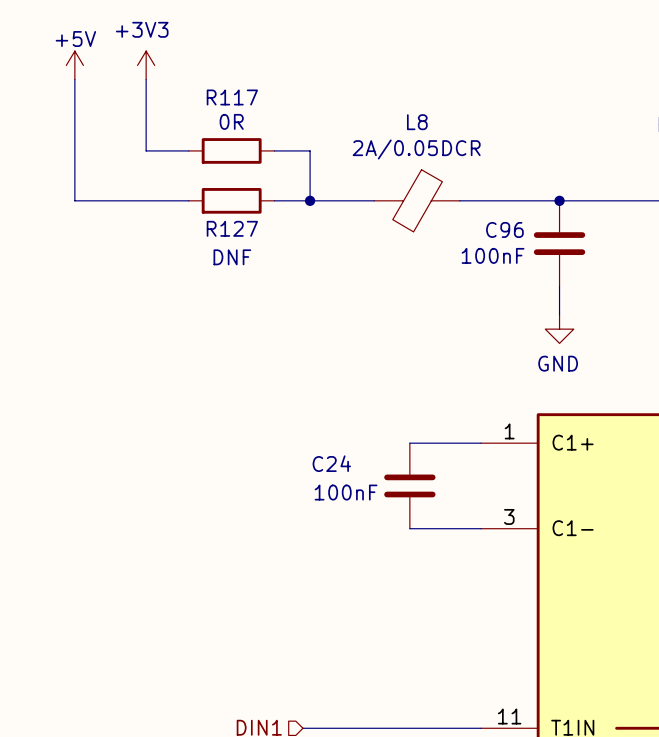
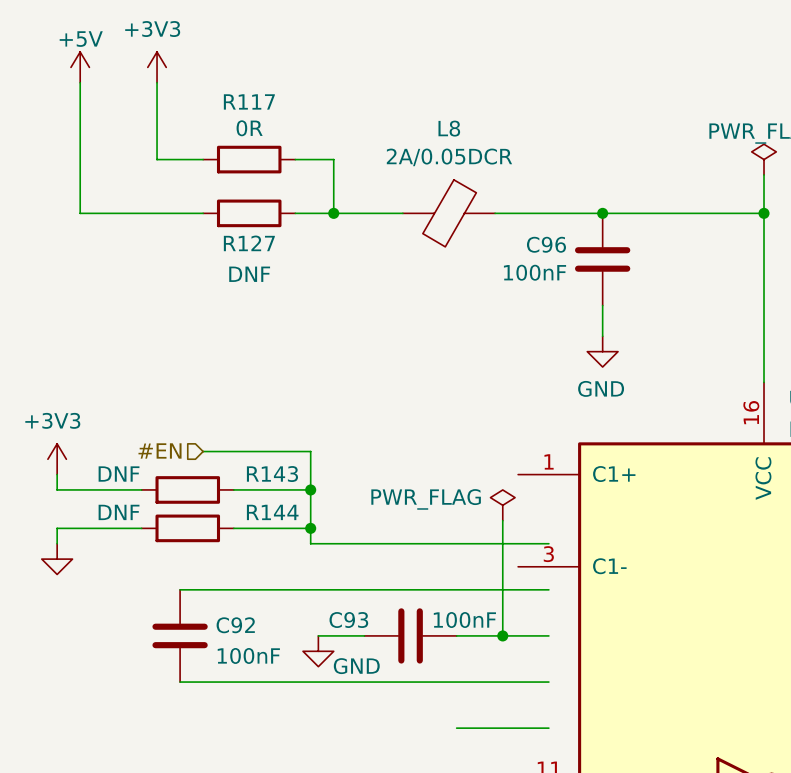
hierarchical label: none -> #EN (160, 450)
wire: none -> (203, 451) (310, 451) (310, 543) (548, 543)
power symbol: none -> +3V3 (57, 459)
wire: none -> (57, 474) (57, 489) (141, 489)
wire: (409, 443) (481, 443) -> (233, 489) (310, 489)
R143: none -> DNF (187, 489)
junction: none -> (310, 489)
power symbol: none -> PWR_FLAG (502, 505)
C24: 100nF (409, 485) -> none
wire: none -> (502, 520) (502, 635)
wire: none -> (141, 528) (57, 528) (57, 543)
R144: none -> DNF (187, 528)
junction: none -> (310, 528)
power symbol: none -> (57, 559)
wire: (409, 528) (481, 528) -> (233, 528) (310, 528)
wire: none -> (180, 589) (548, 589)
C92: none -> 100nF (180, 635)
wire: none -> (318, 635) (364, 635)
C93: none -> 100nF (410, 635)
wire: none -> (456, 635) (548, 635)
junction: none -> (502, 635)
power symbol: none -> GND (318, 651)
wire: none -> (180, 682) (548, 682)
wire: none -> (456, 728) (548, 728)

